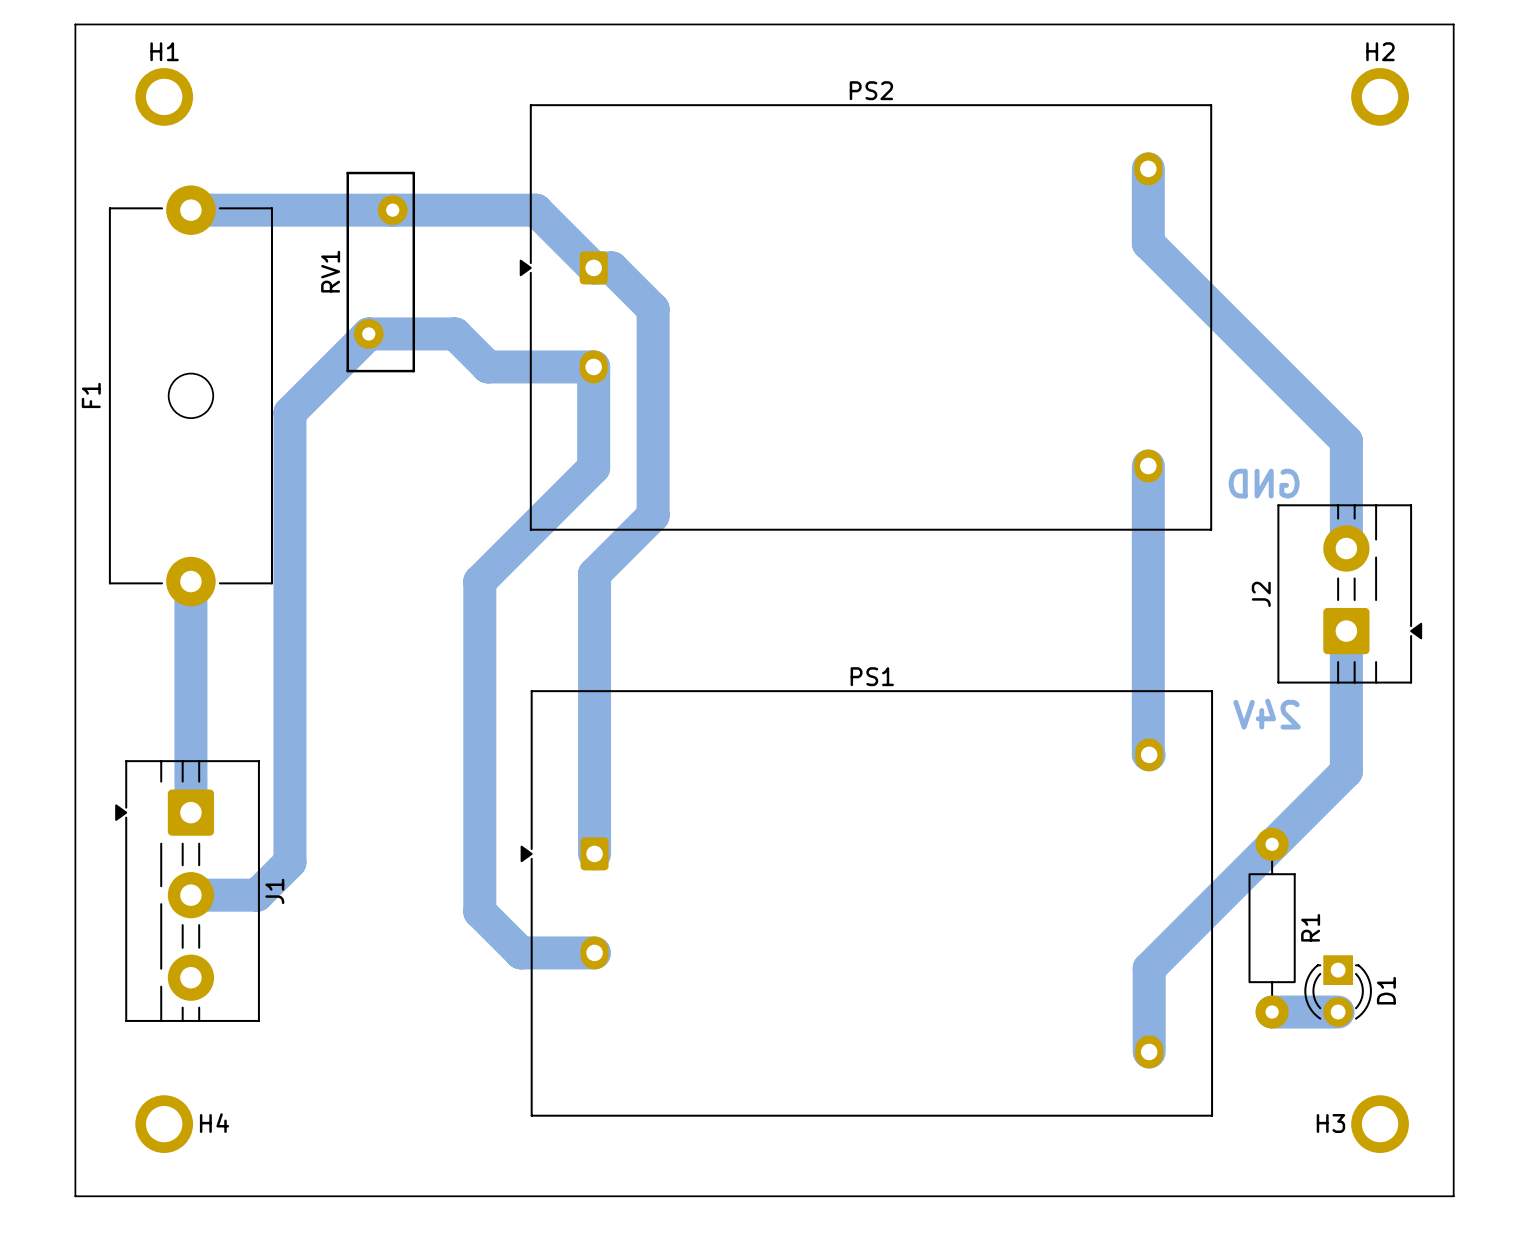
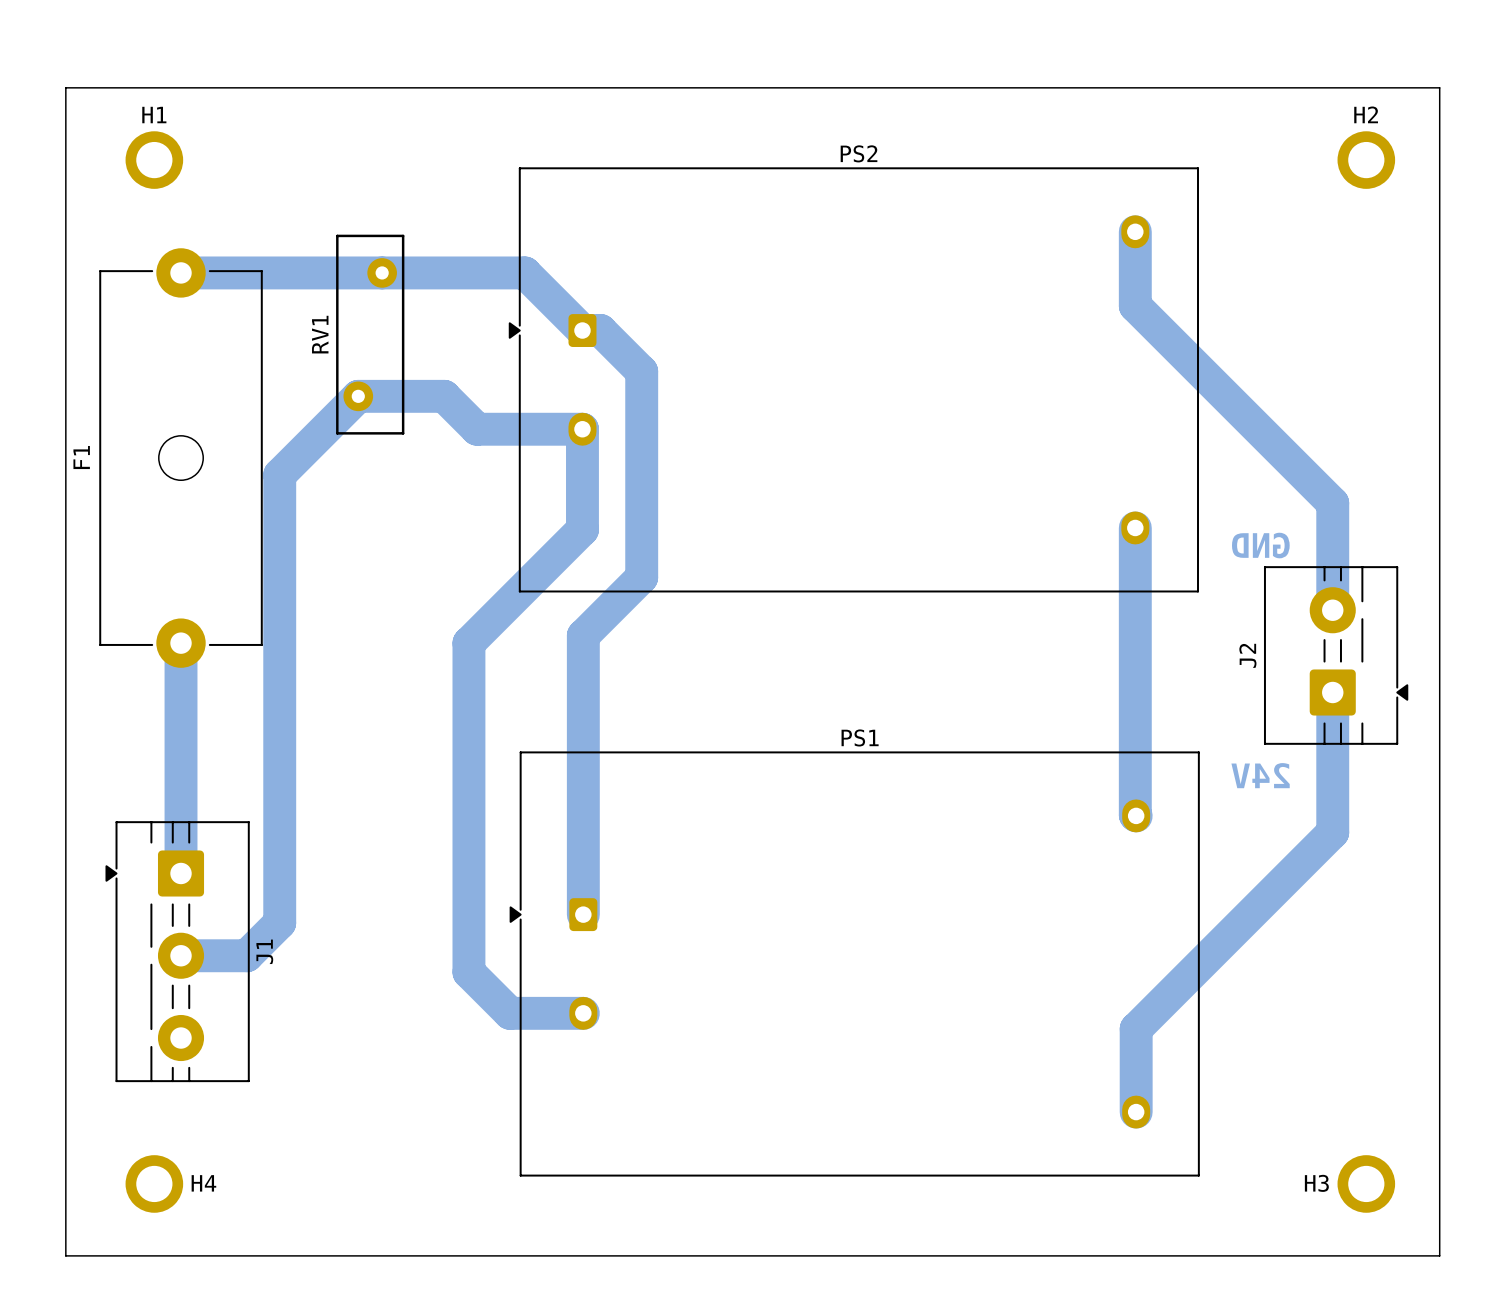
R1: (1272, 928) -> none
D1: (1338, 991) -> none
bottom track: (1272, 1012) (1338, 1012) -> none

